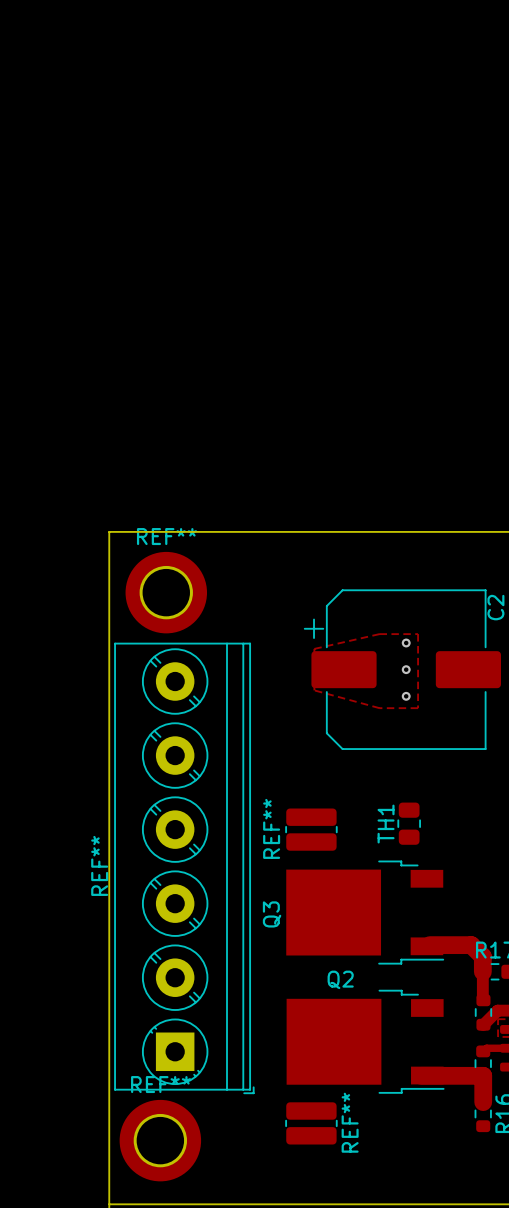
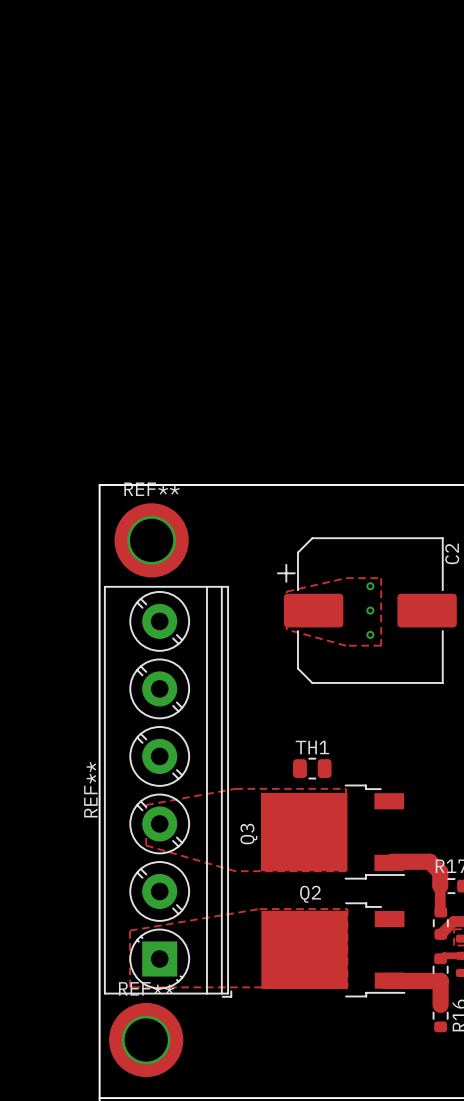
TH1 rotation: 0° (409, 823) -> 90° clockwise (312, 768)
TH1 position: (409, 823) -> (312, 768)
REF**: (311, 829) -> none
zone outline: none -> (235, 788) (146, 805) (146, 845) (235, 871) (346, 871) (346, 788) (235, 788)
zone outline: none -> (259, 909) (130, 930) (130, 987) (347, 987) (347, 909) (259, 909)
REF**: (311, 1123) -> none

